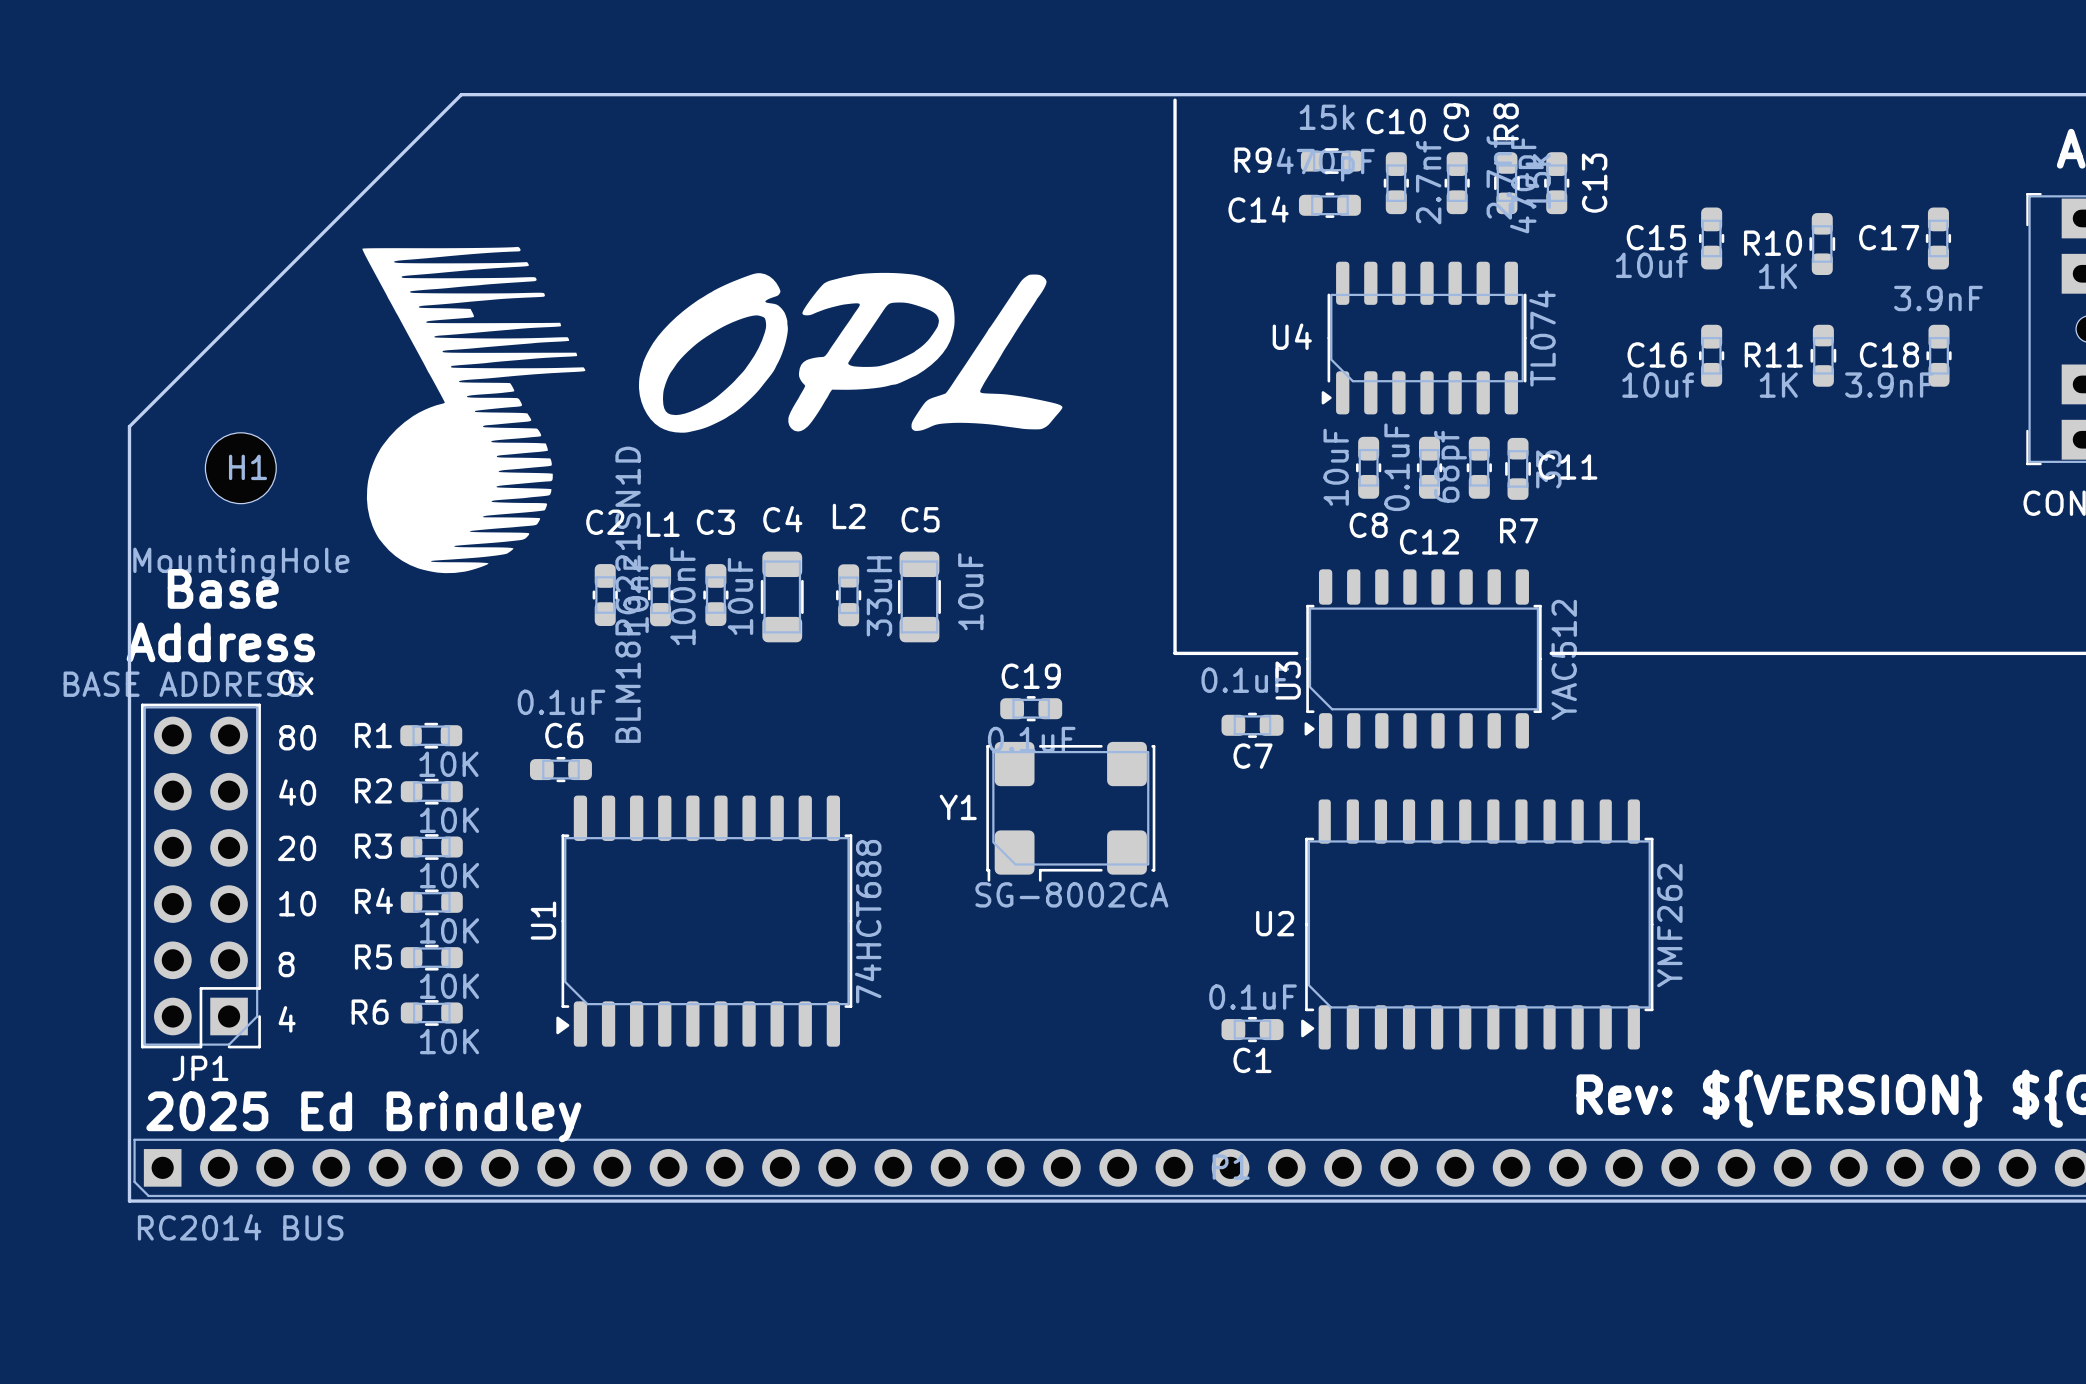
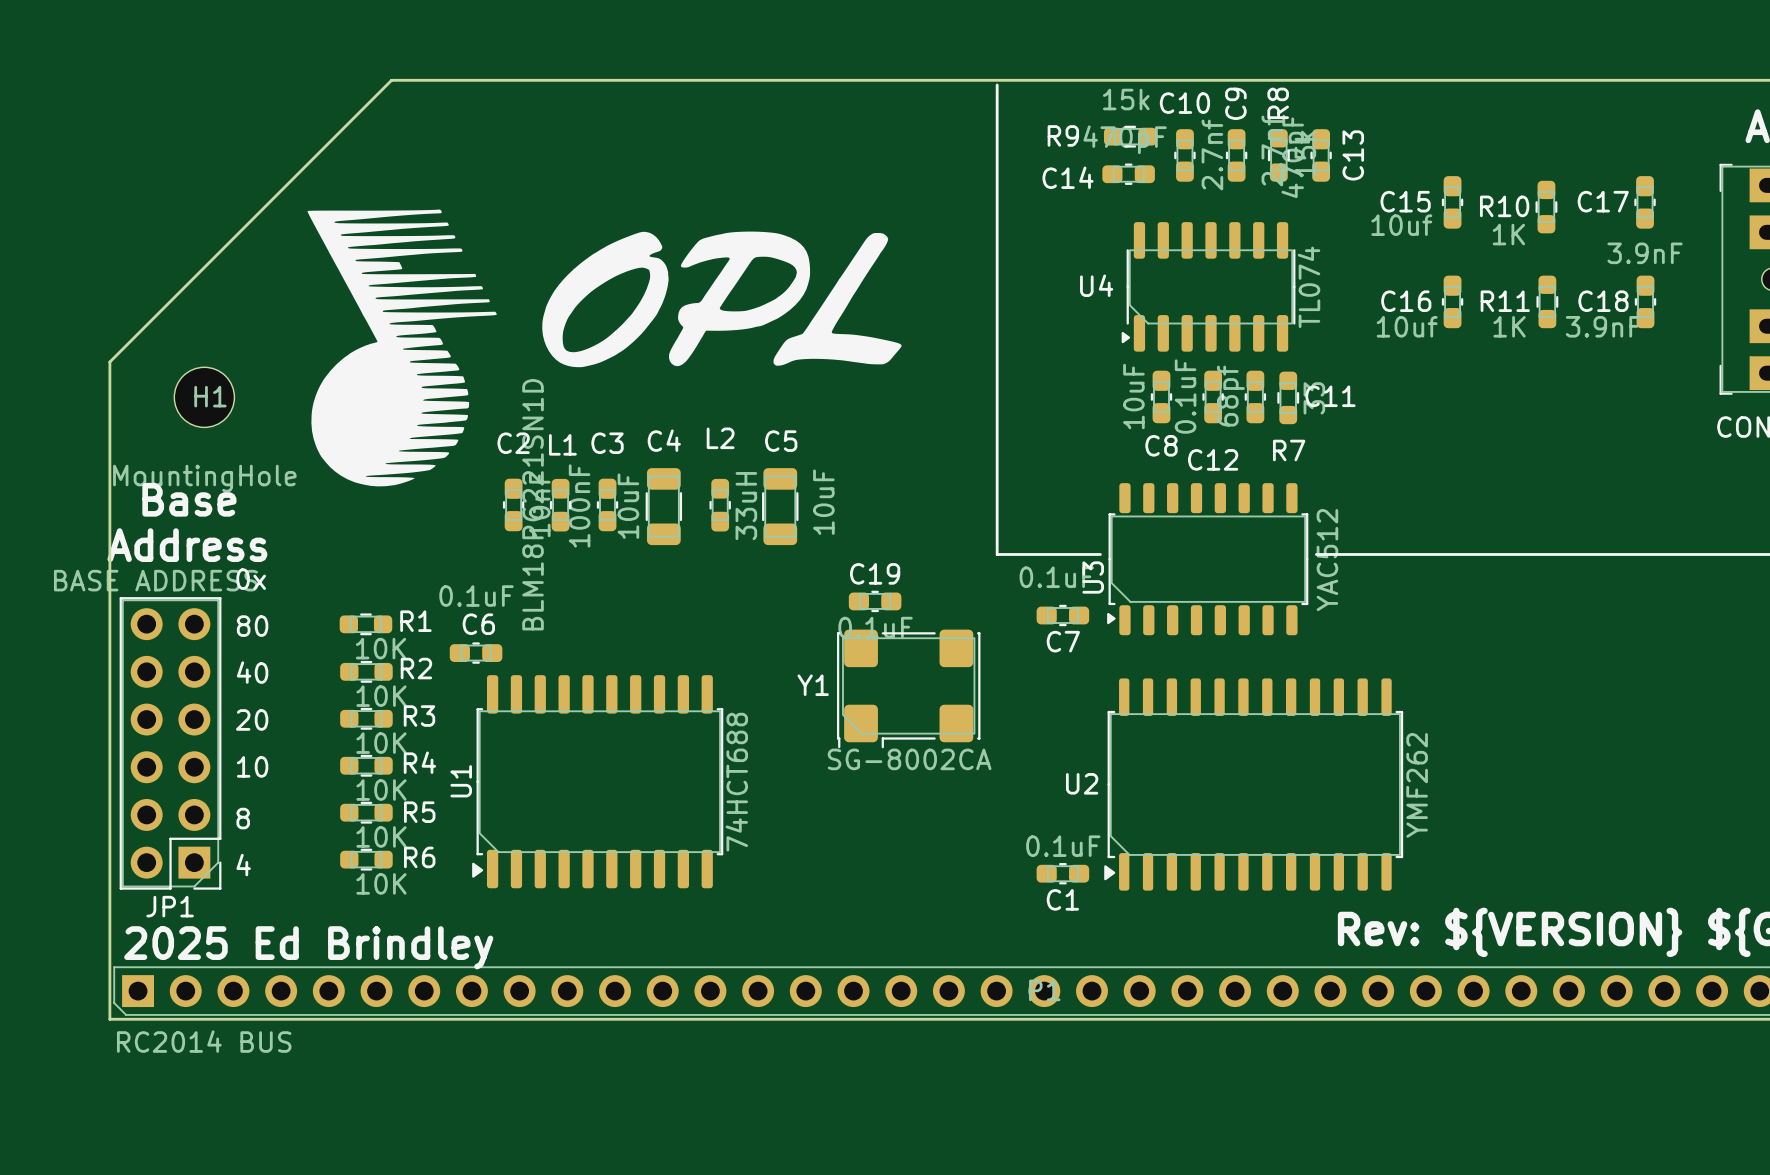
R1 name position: R1 (373, 735) -> R1 (415, 621)
R2 name position: R2 (373, 790) -> R2 (416, 668)
R3 name position: R3 (373, 846) -> R3 (419, 716)
R4 name position: R4 (373, 900) -> R4 (419, 762)
R5 name position: R5 (373, 957) -> R5 (419, 812)
R6 name position: R6 (370, 1012) -> R6 (419, 857)

